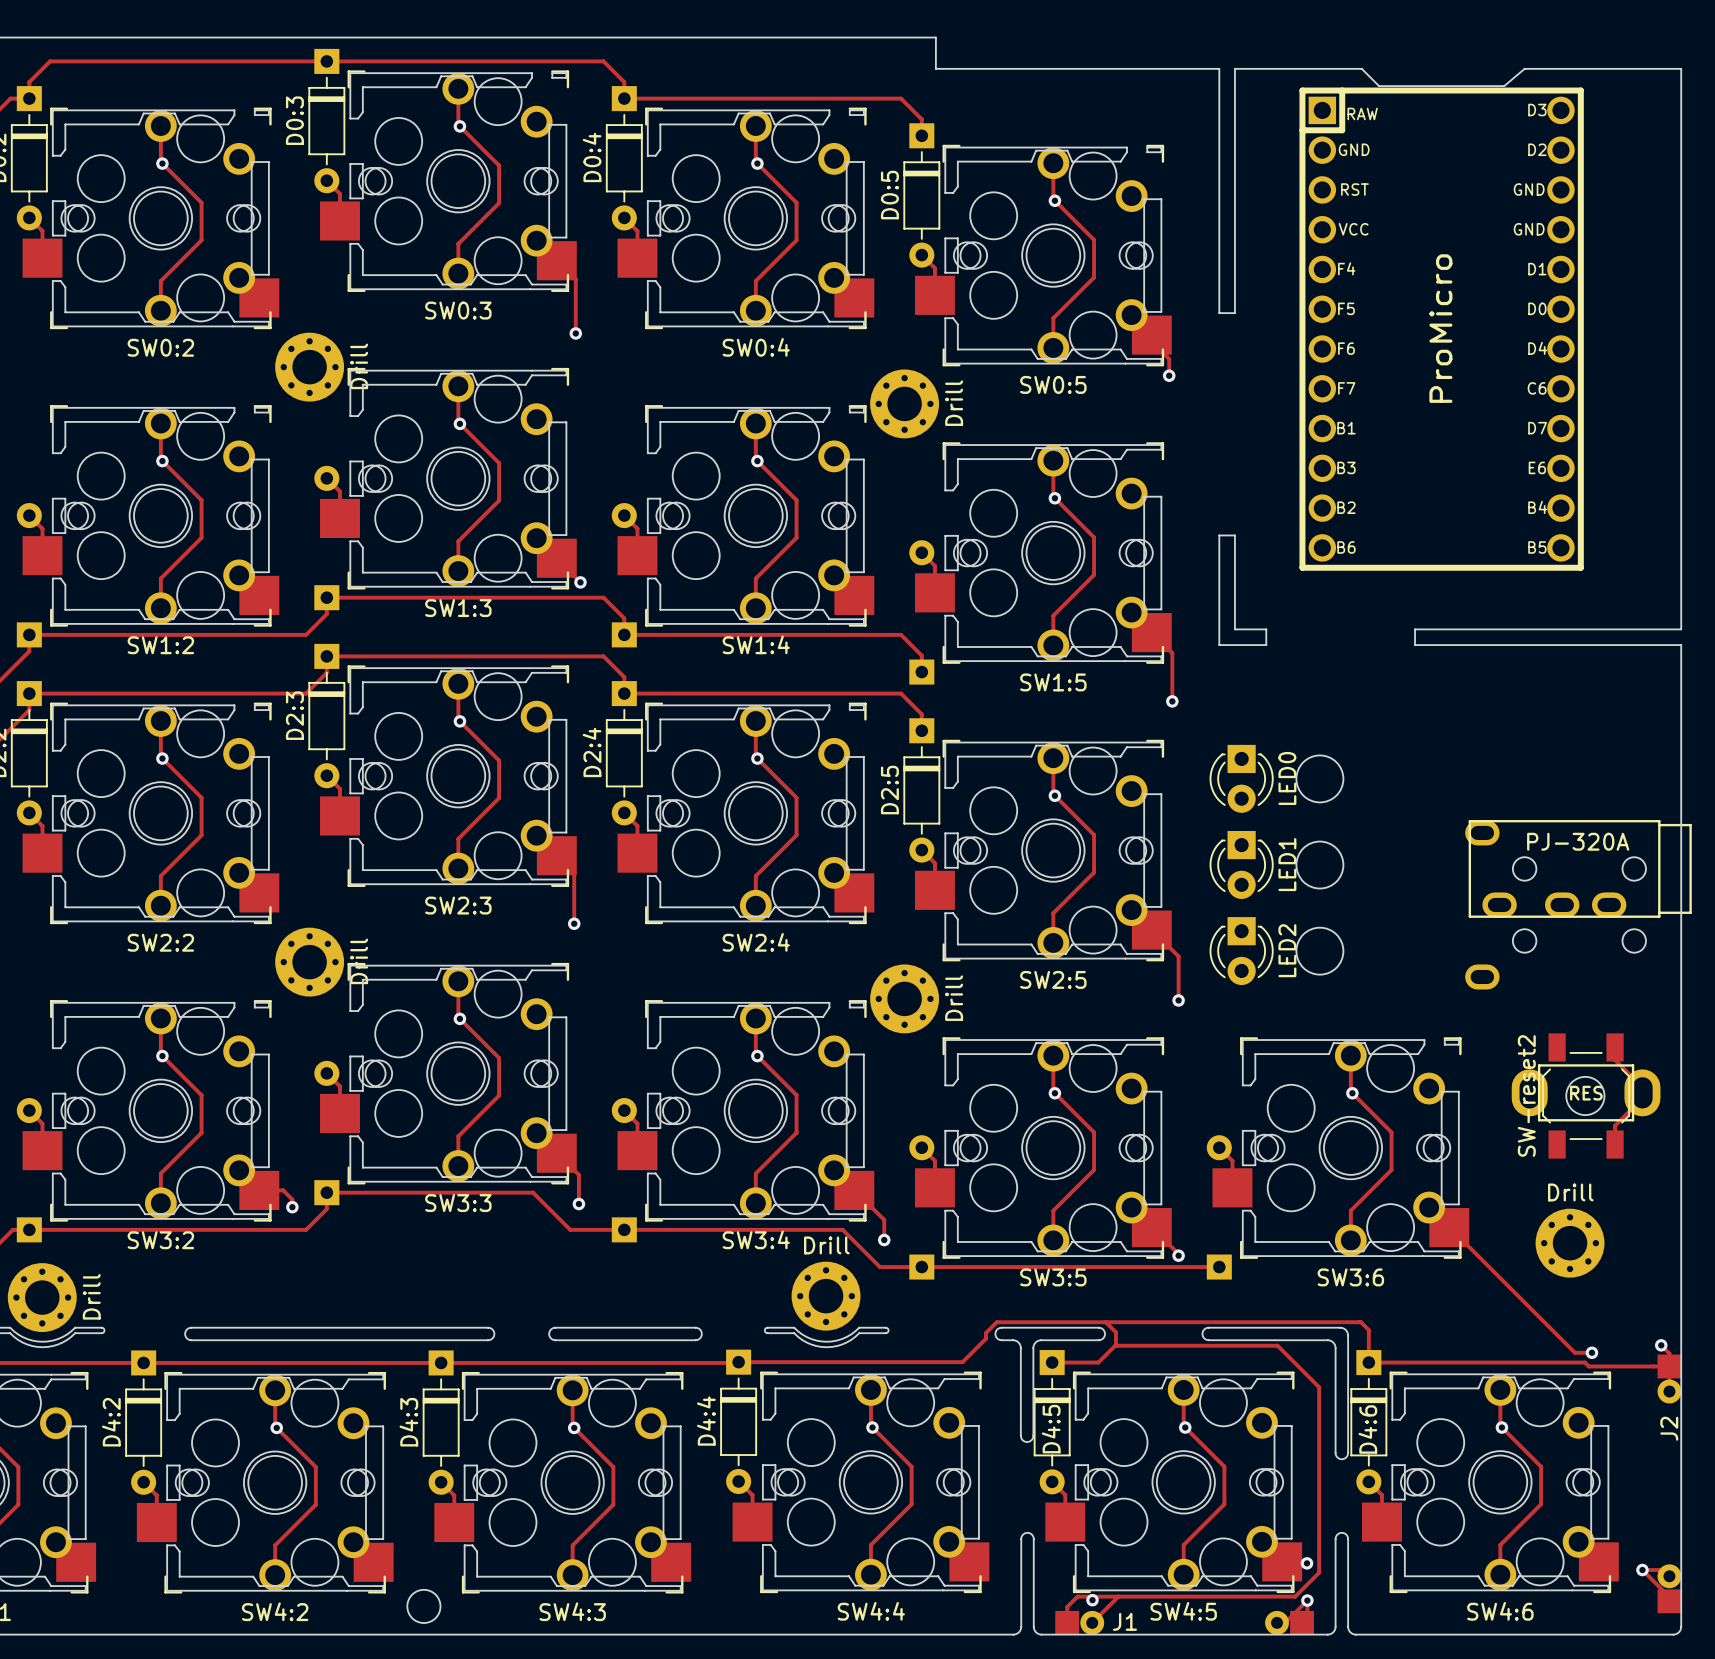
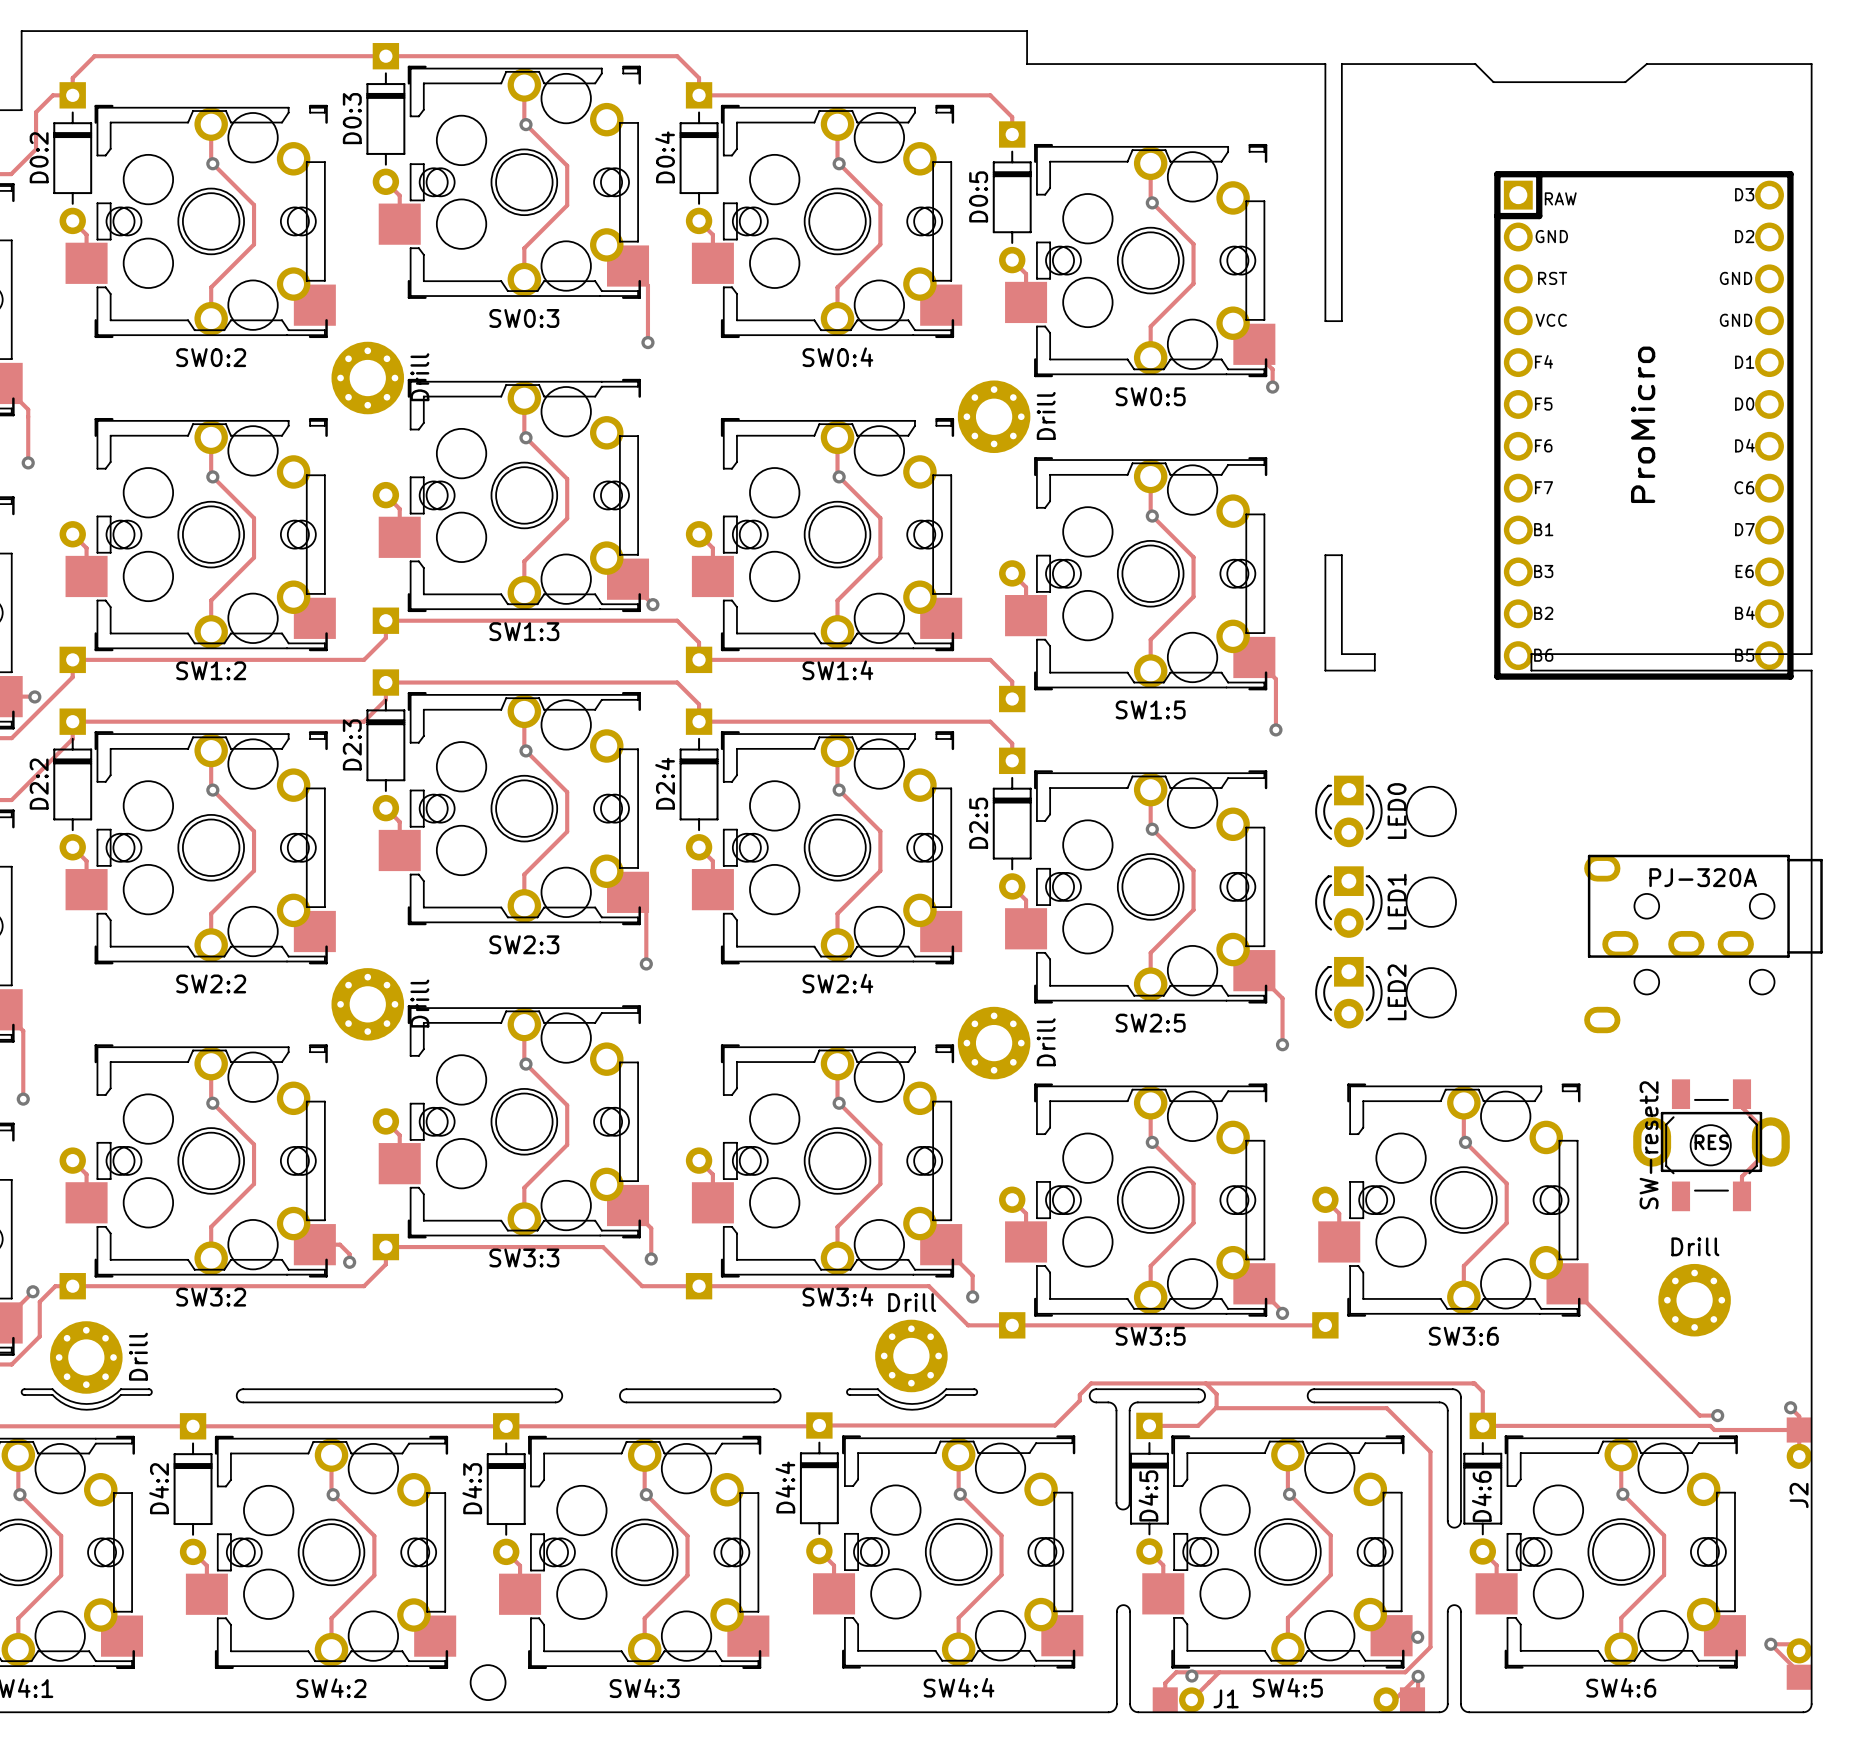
part position: (1441, 329) -> (1643, 425)

